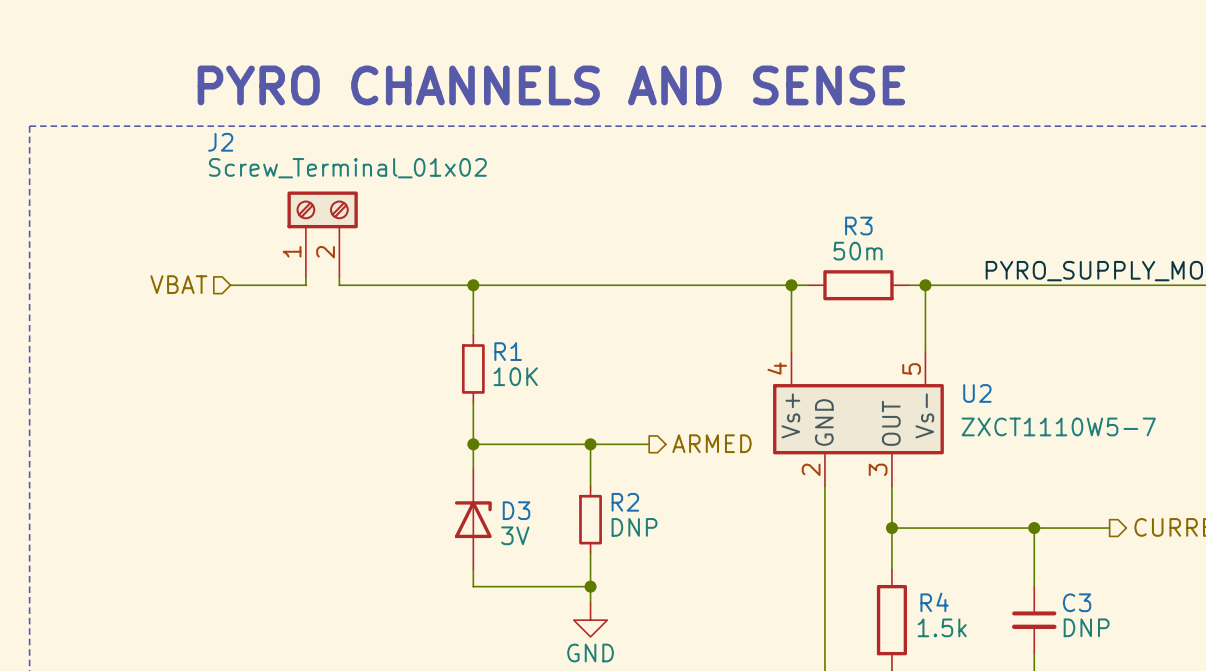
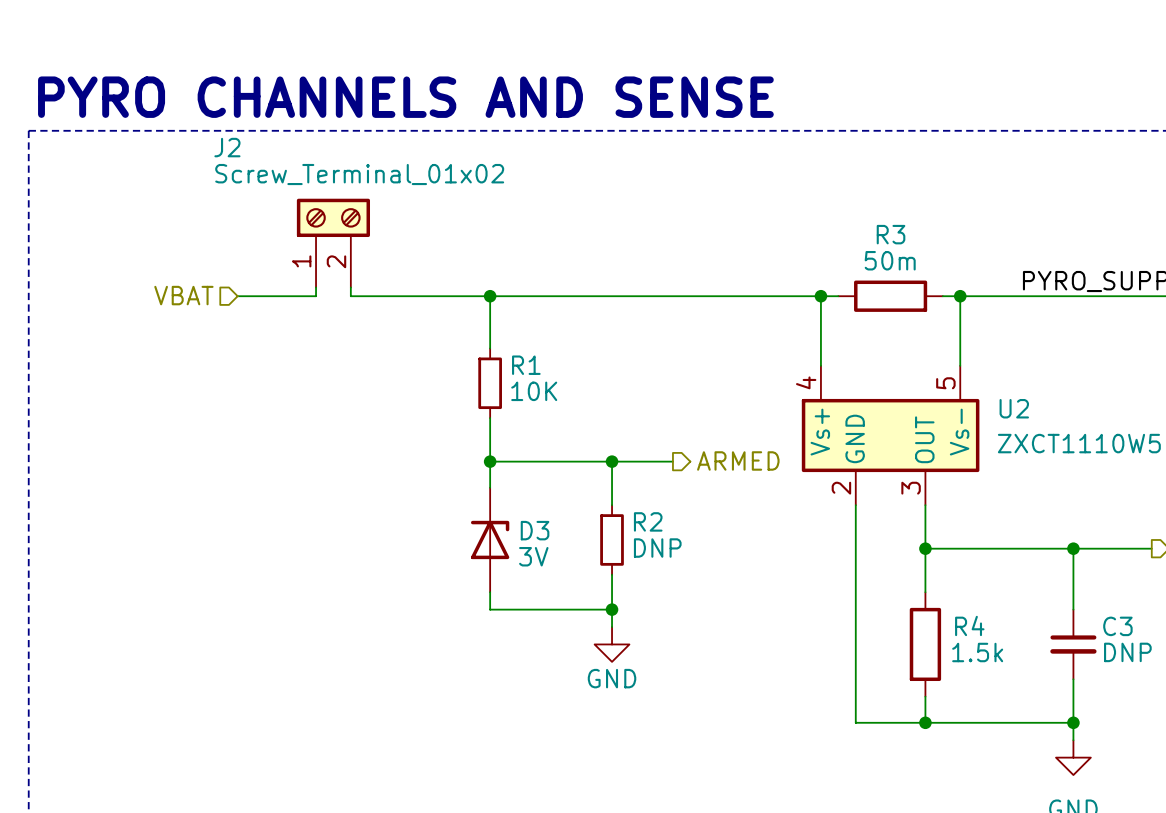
text position: PYRO CHANNELS AND SENSE (551, 85) -> PYRO CHANNELS AND SENSE (405, 97)

